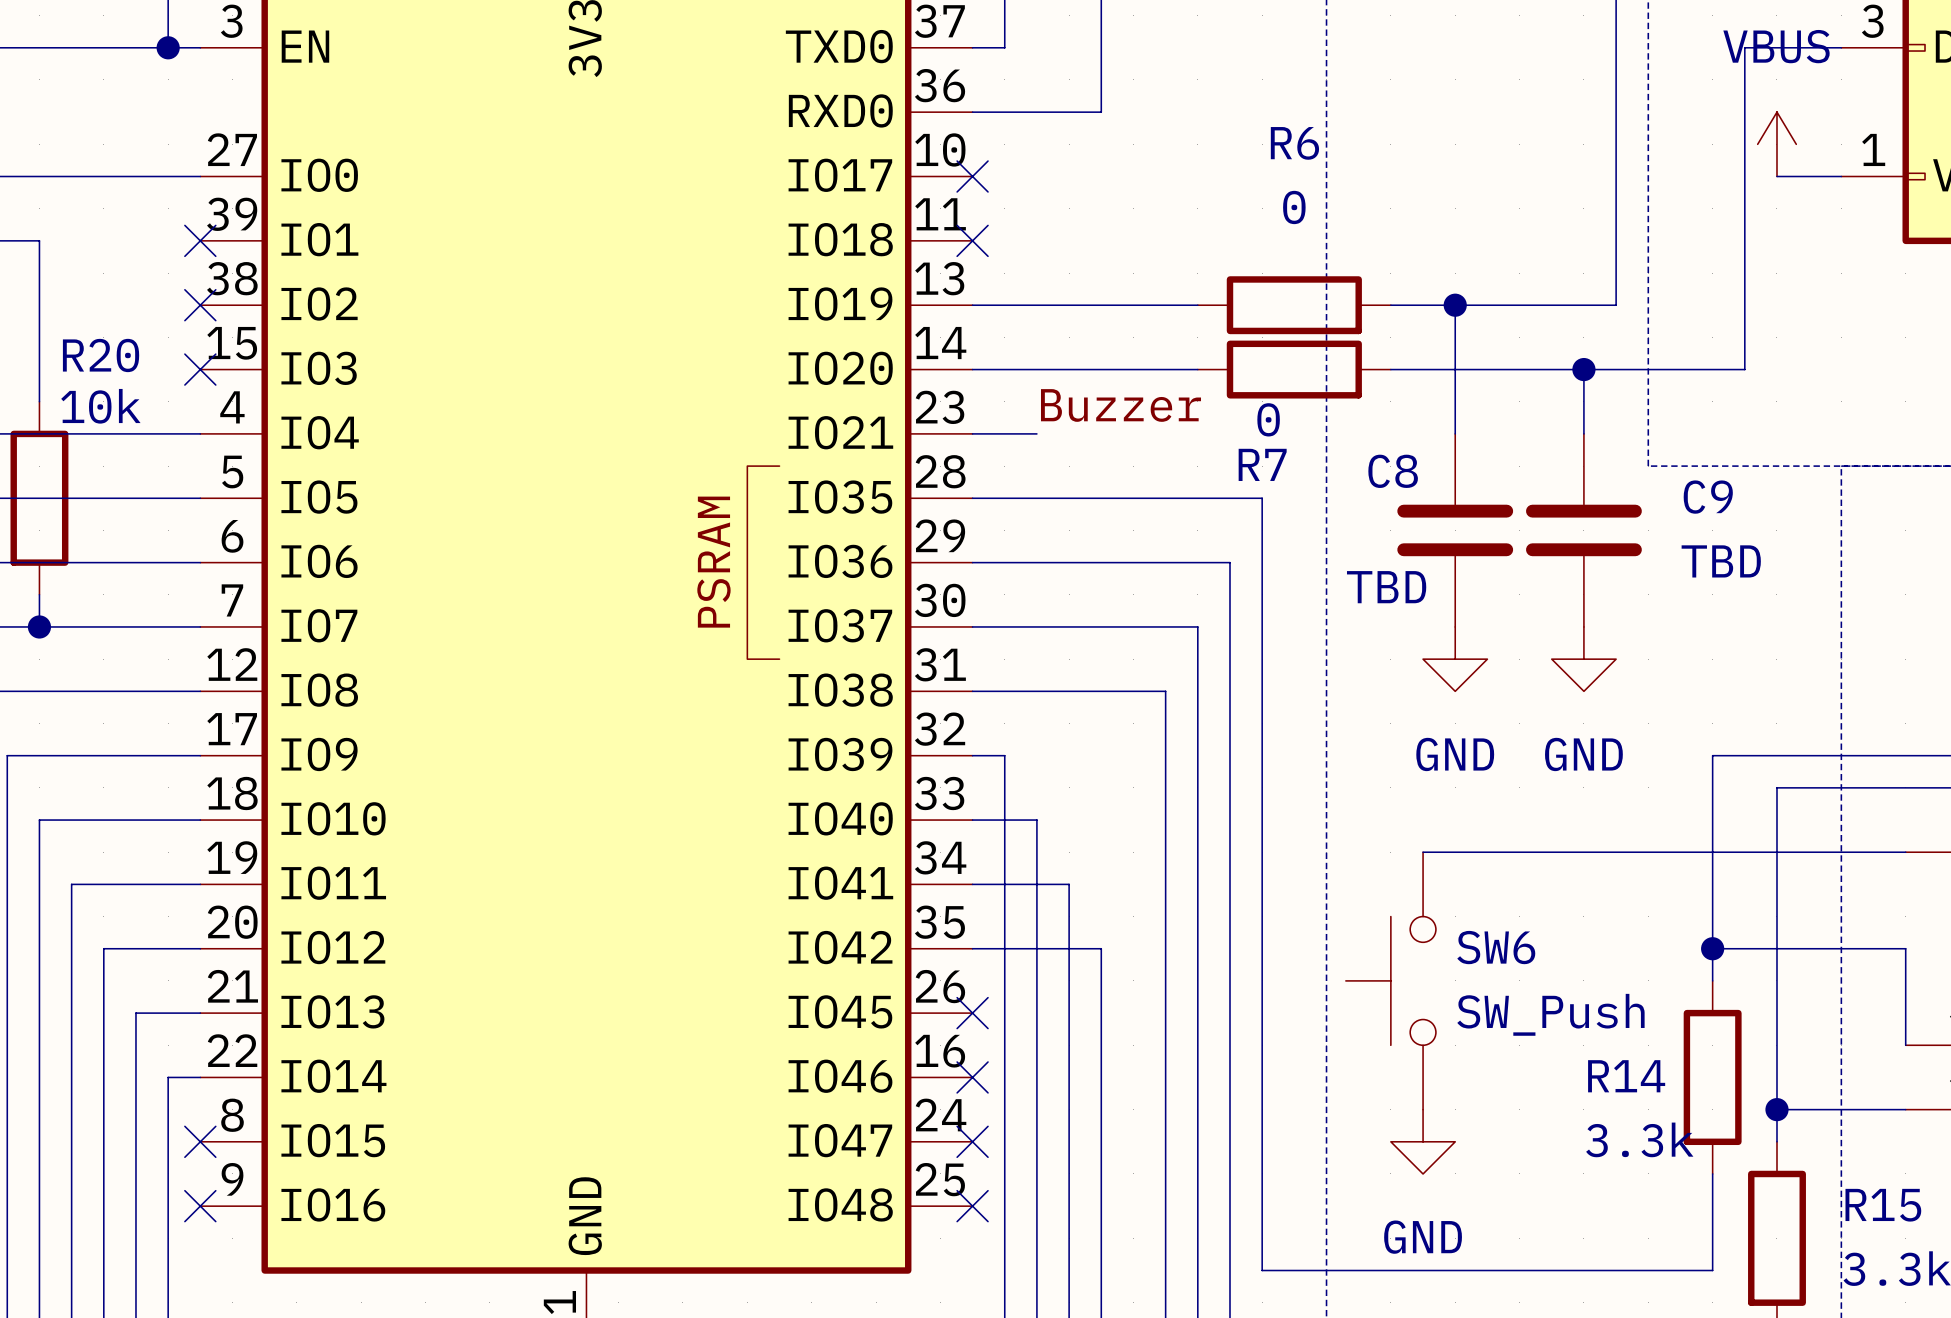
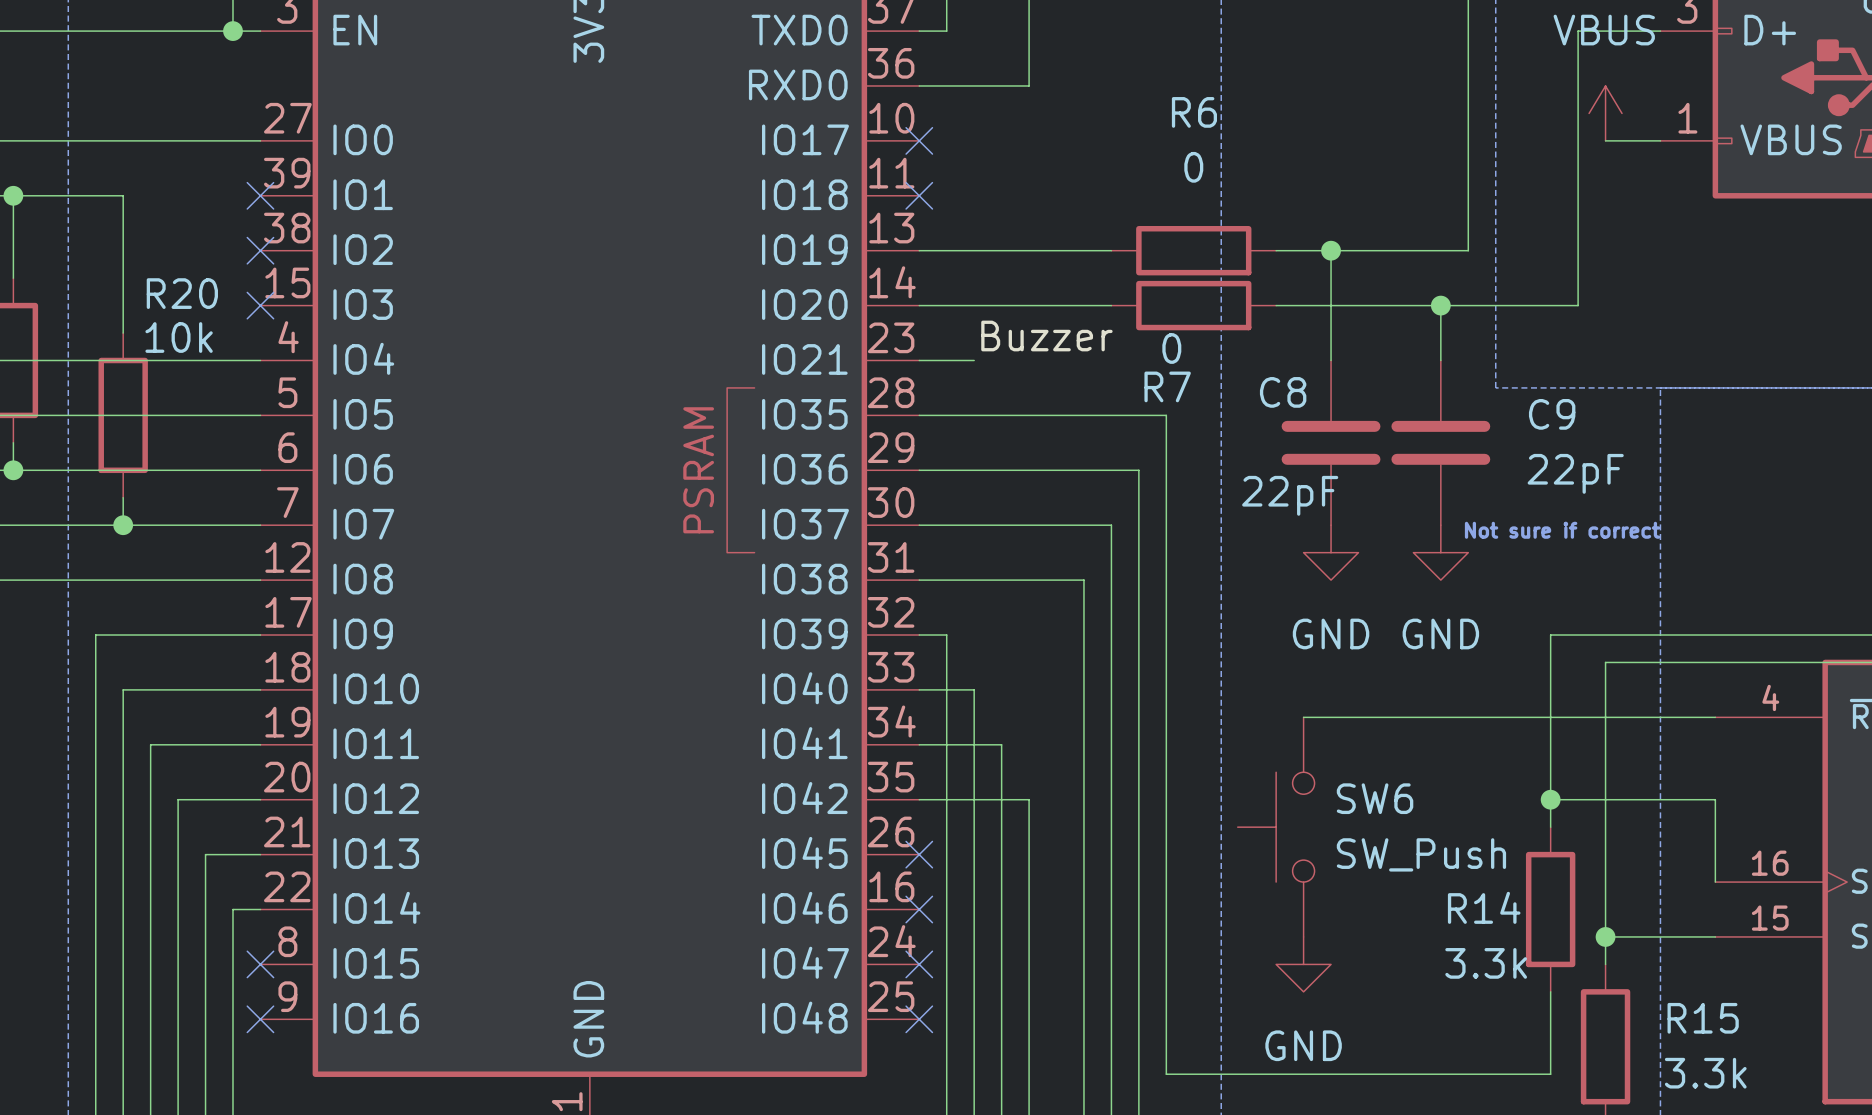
C9 value: TBD (1721, 561) -> 22pF (1575, 473)
C8 value: TBD (1386, 587) -> 22pF (1290, 495)
text: none -> Not sure if correct (1562, 530)

